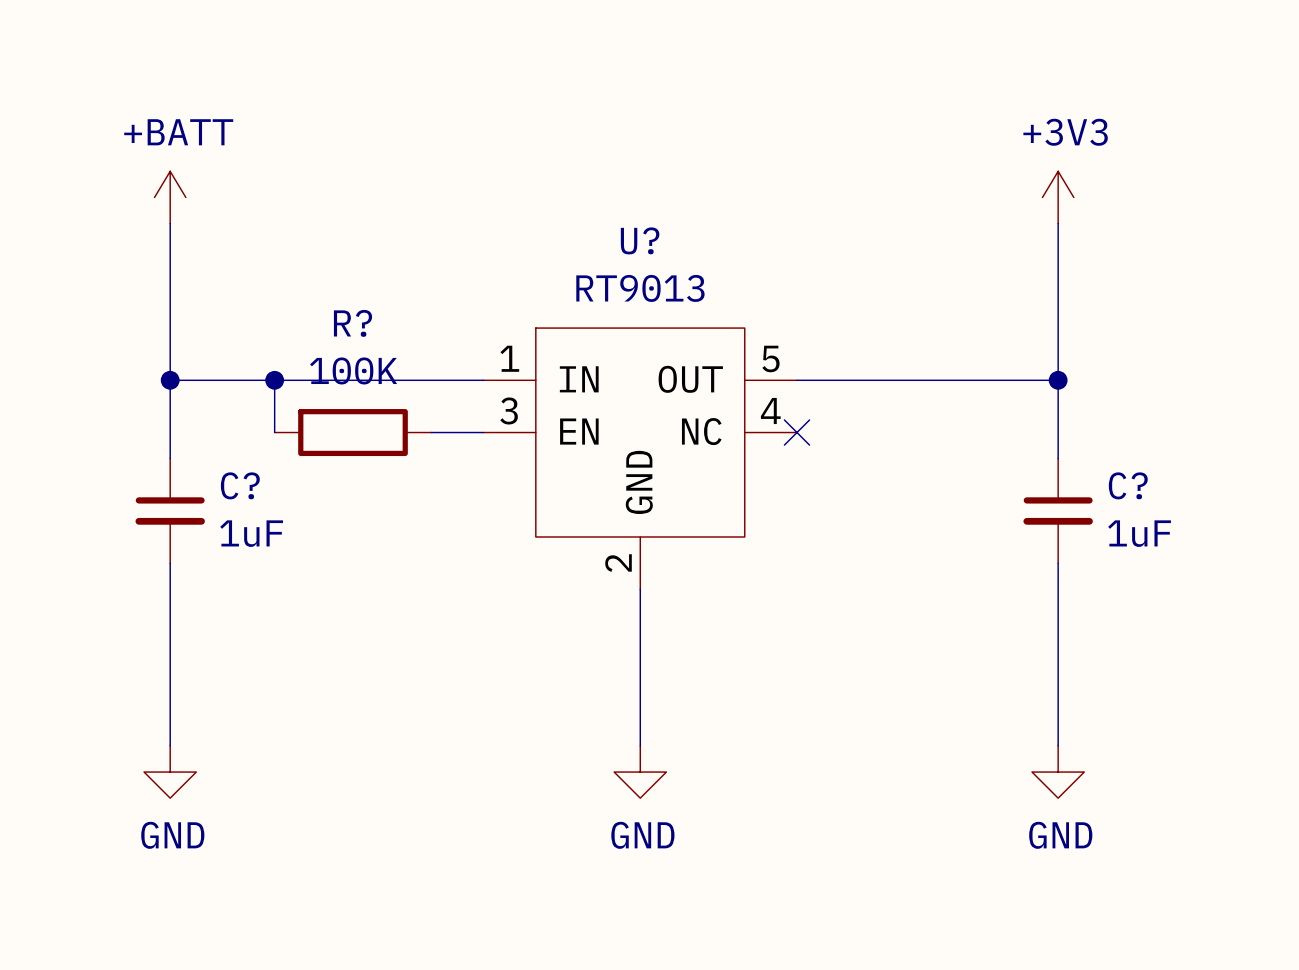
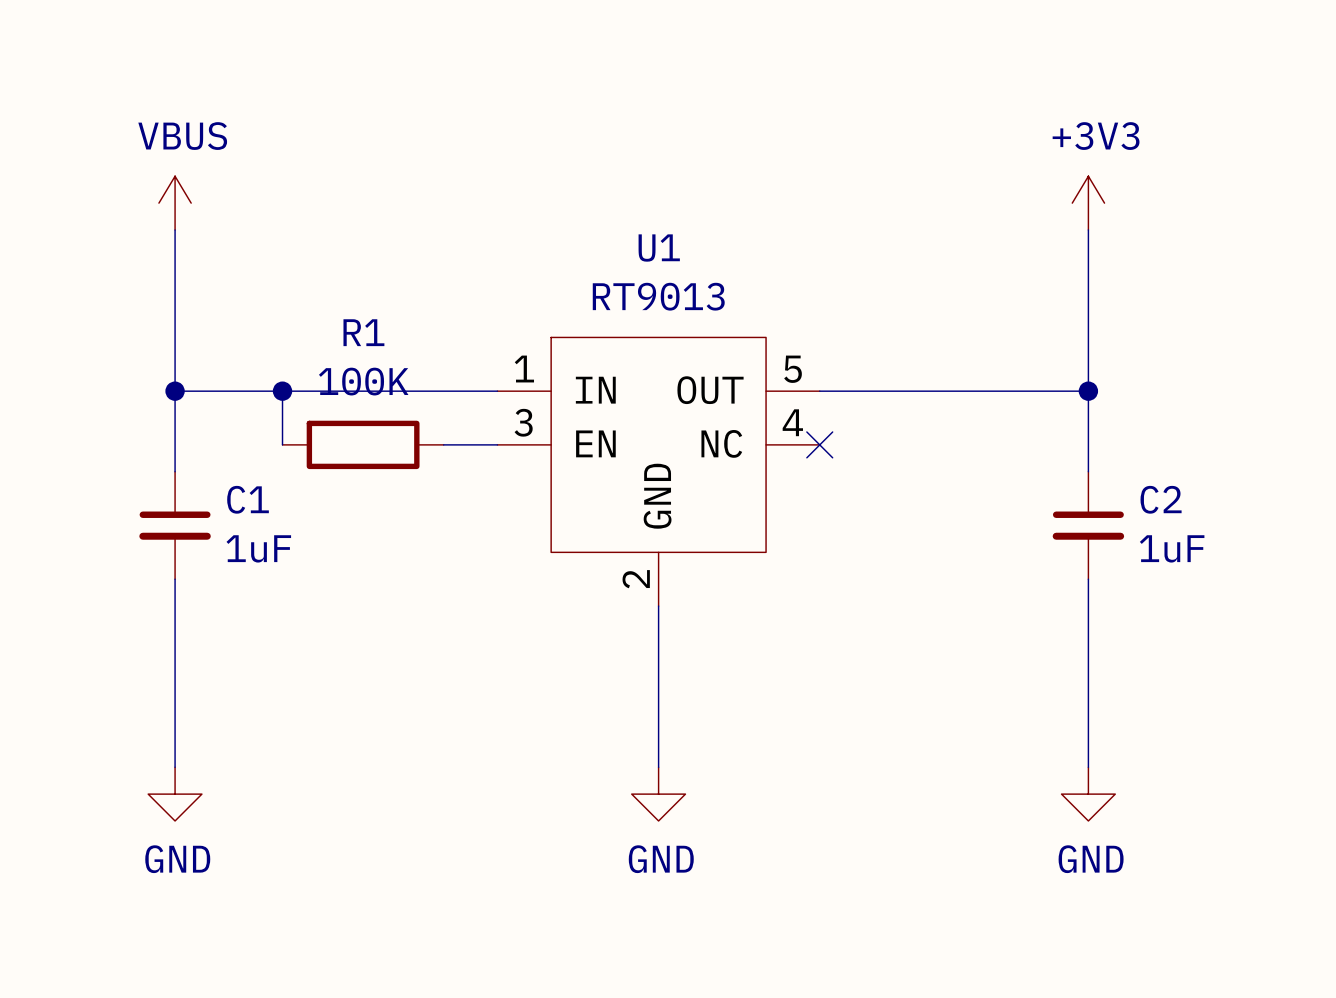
power symbol: +BATT (170, 197) -> VBUS (175, 203)
U? name: U? (640, 240) -> U1 (659, 248)
R? name: R? (353, 323) -> R1 (363, 332)
C? name: C? (240, 485) -> C1 (248, 499)
C? name: C? (1128, 485) -> C2 (1161, 499)

